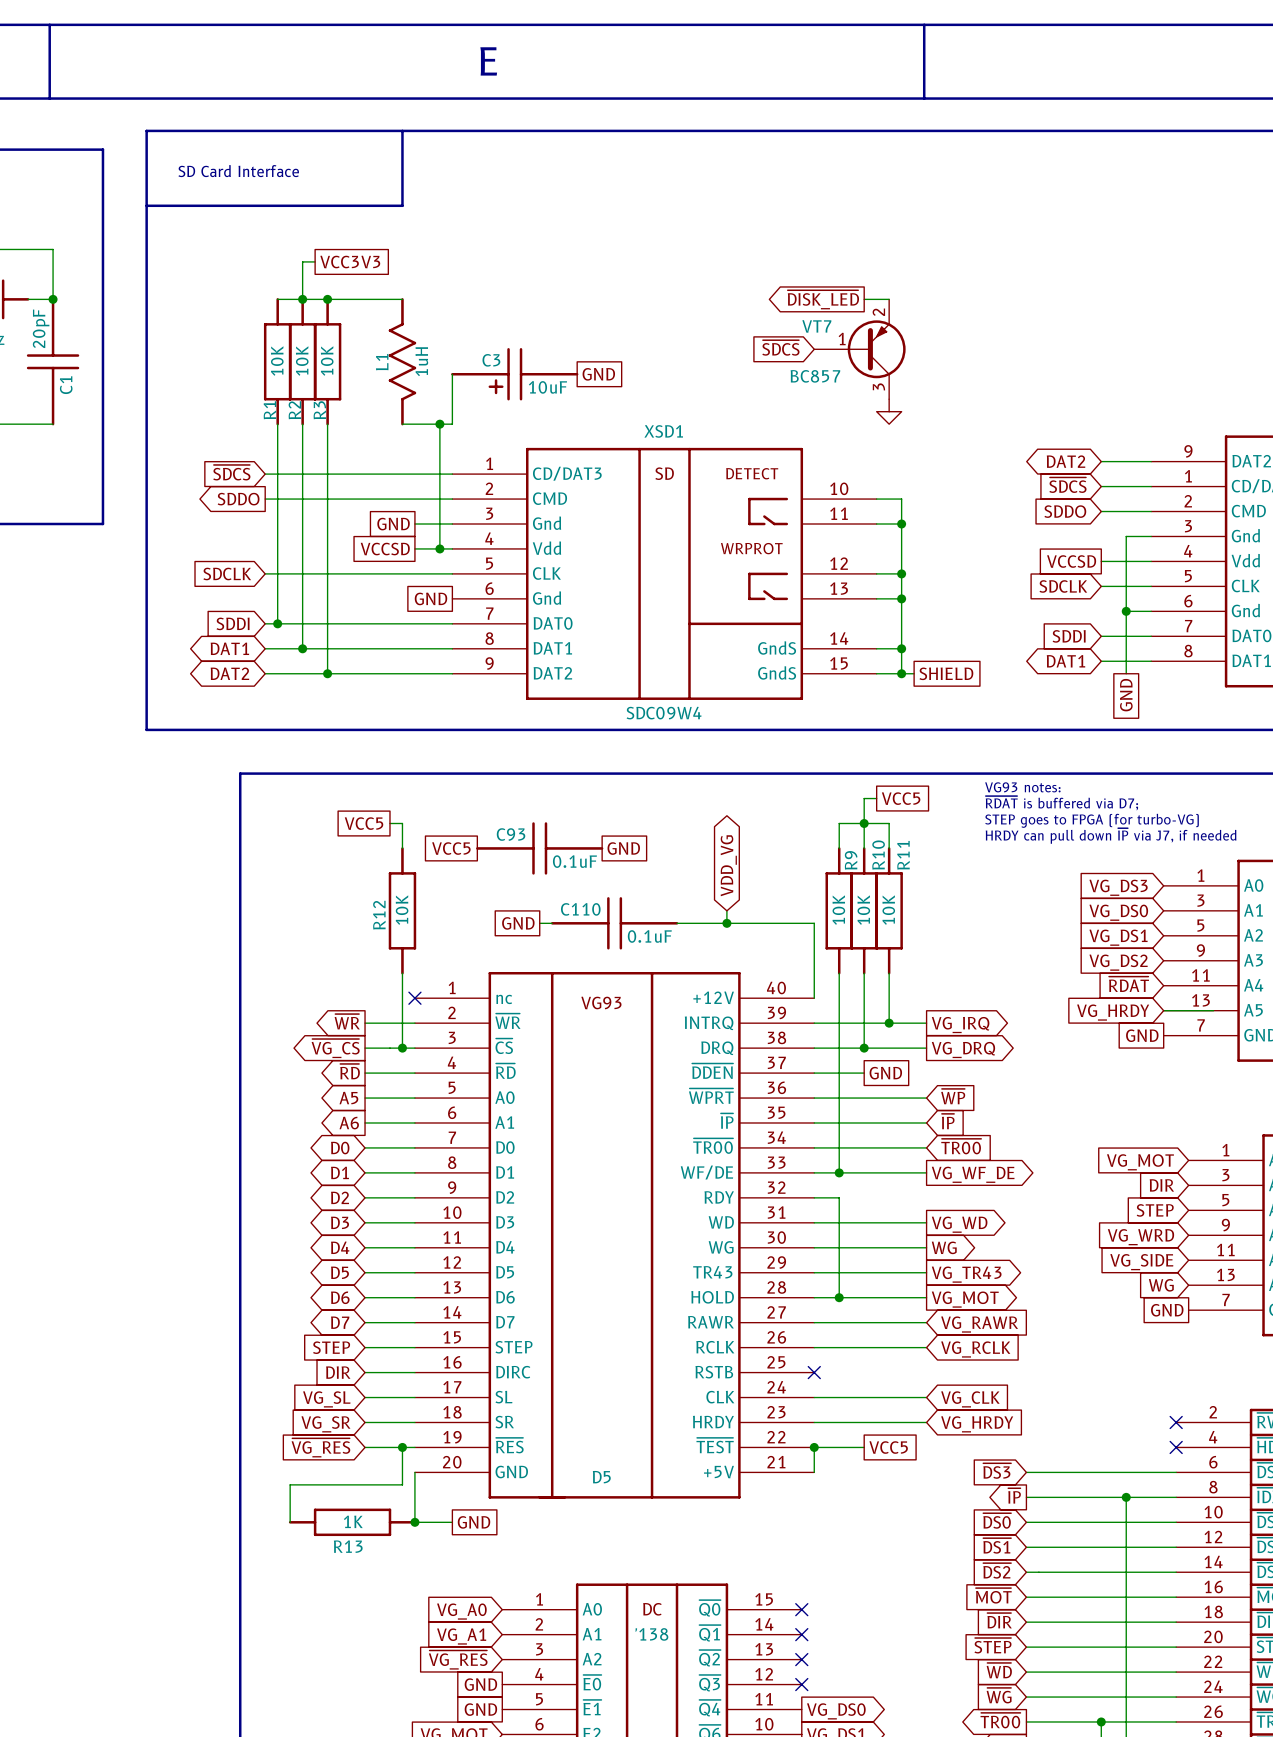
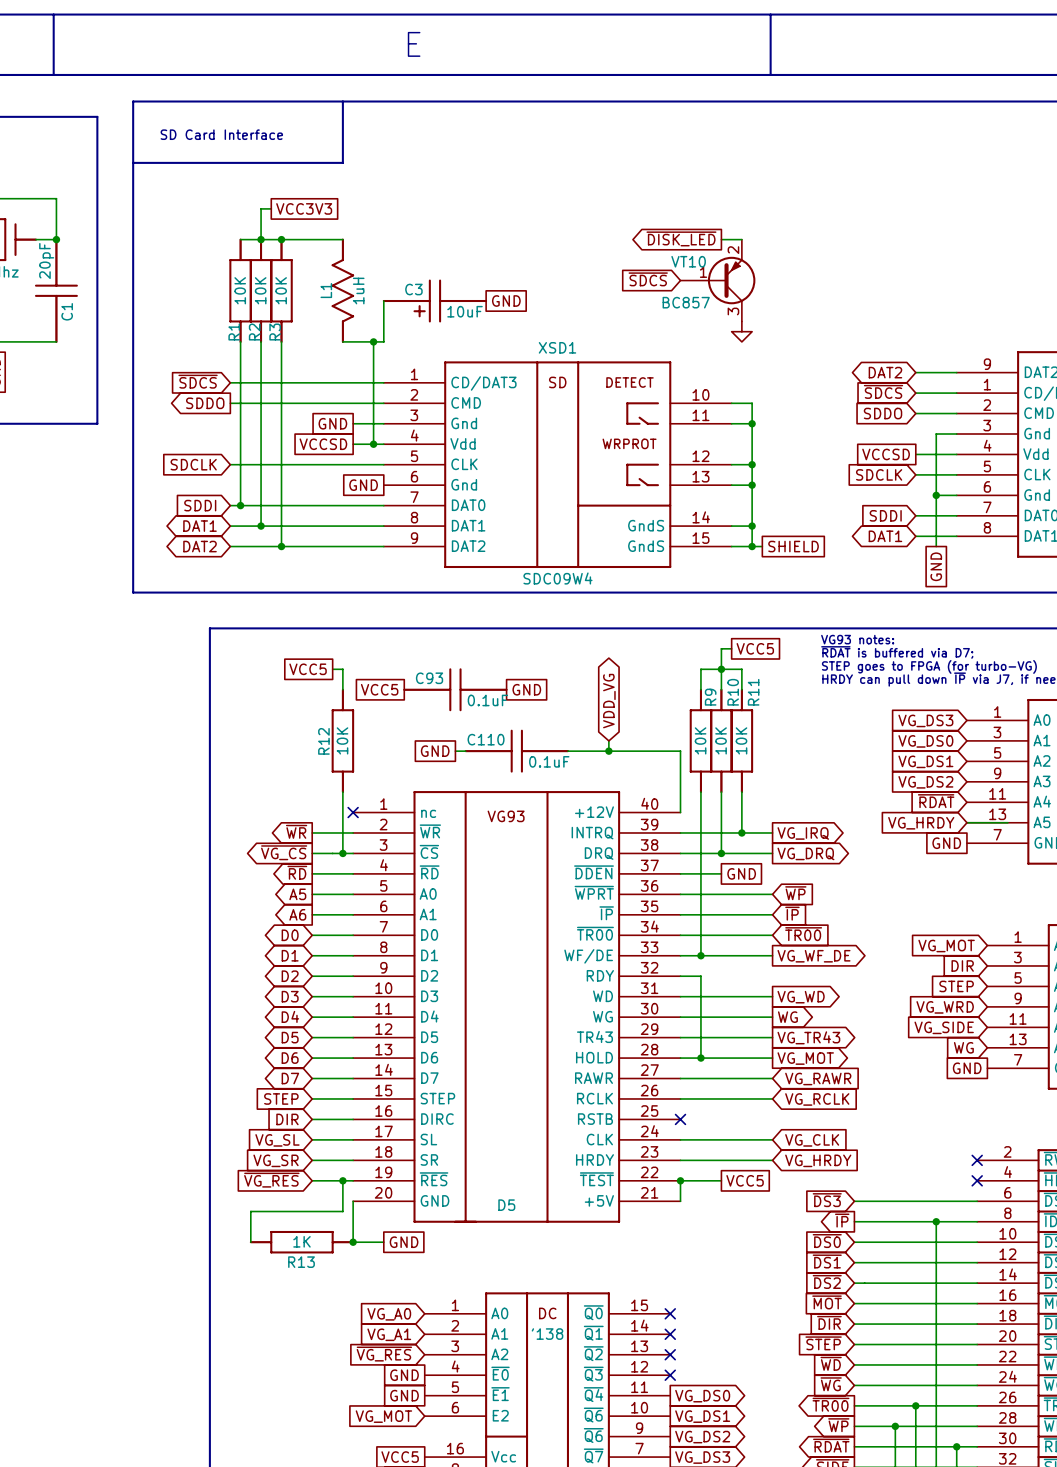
VT7 name: VT7 (816, 326) -> VT10 (688, 261)

